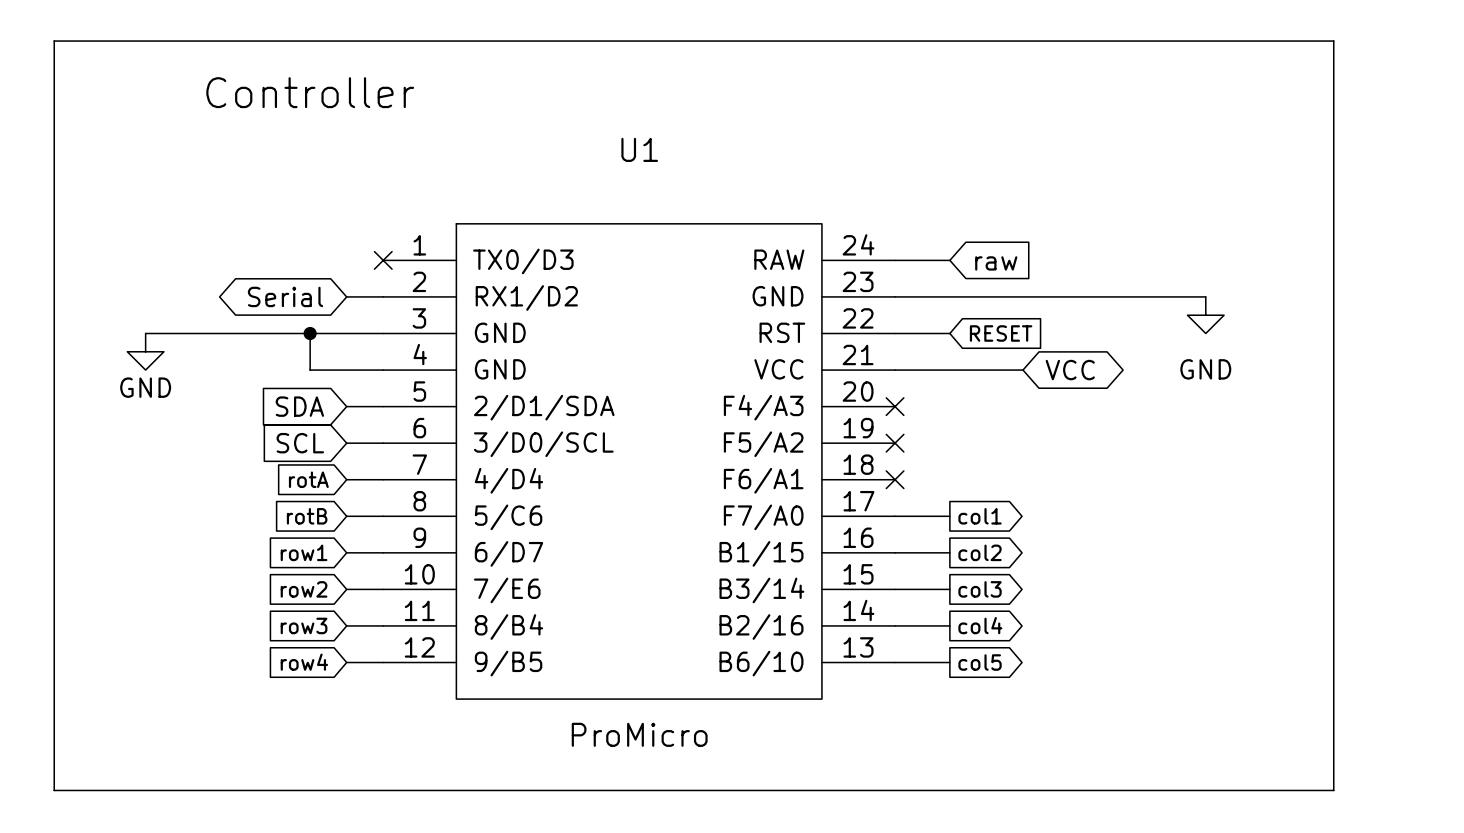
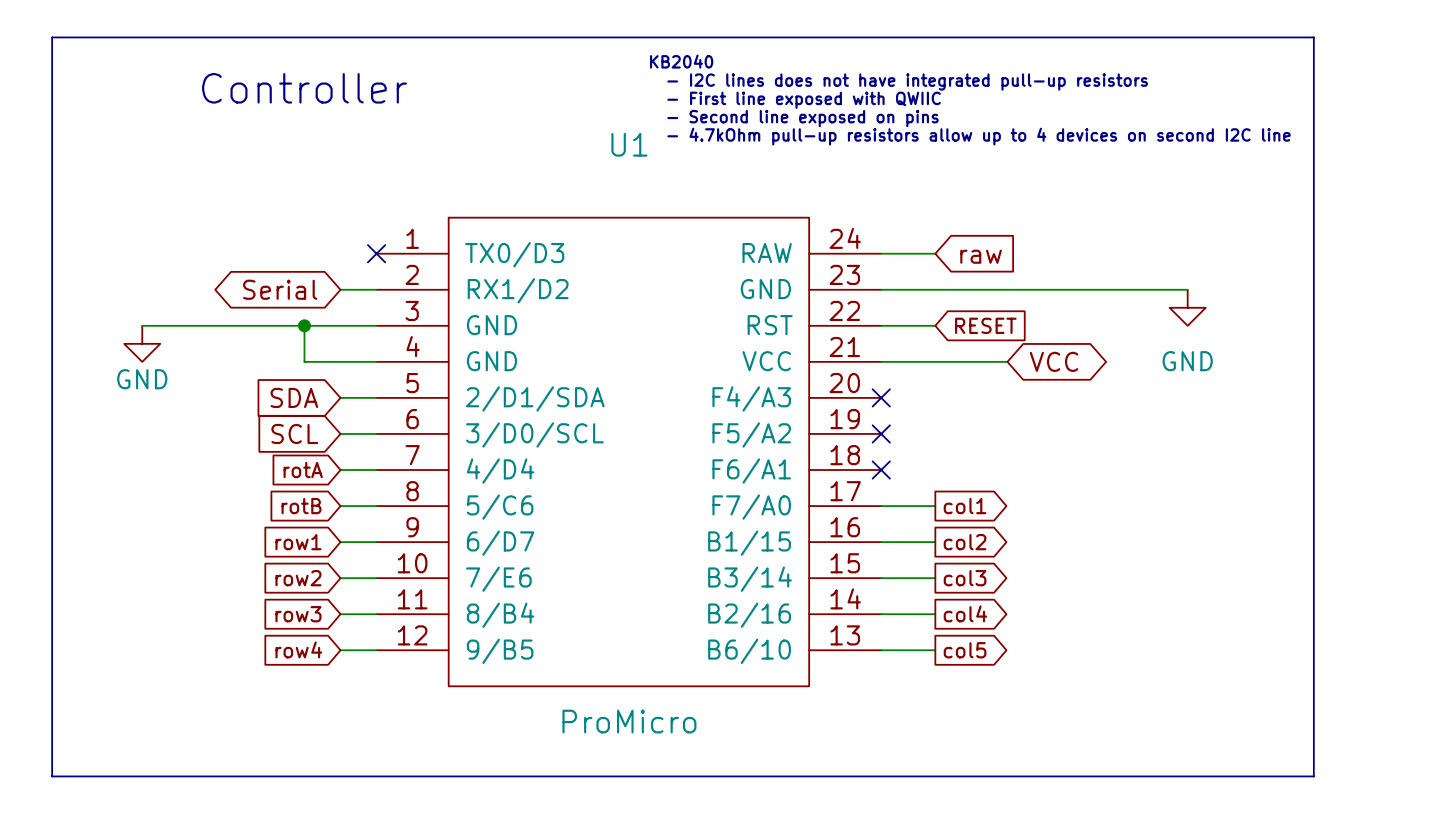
text: none -> KB2040 (681, 61)
text: none -> - I2C lines does not have integrated pull-up resistors (907, 82)
text: none -> - First line exposed with QWIIC (804, 100)
text: none -> - Second line exposed on pins (803, 118)
text: none -> - 4.7kOhm pull-up resistors allow up to 4 devices on second I2C line (978, 136)

